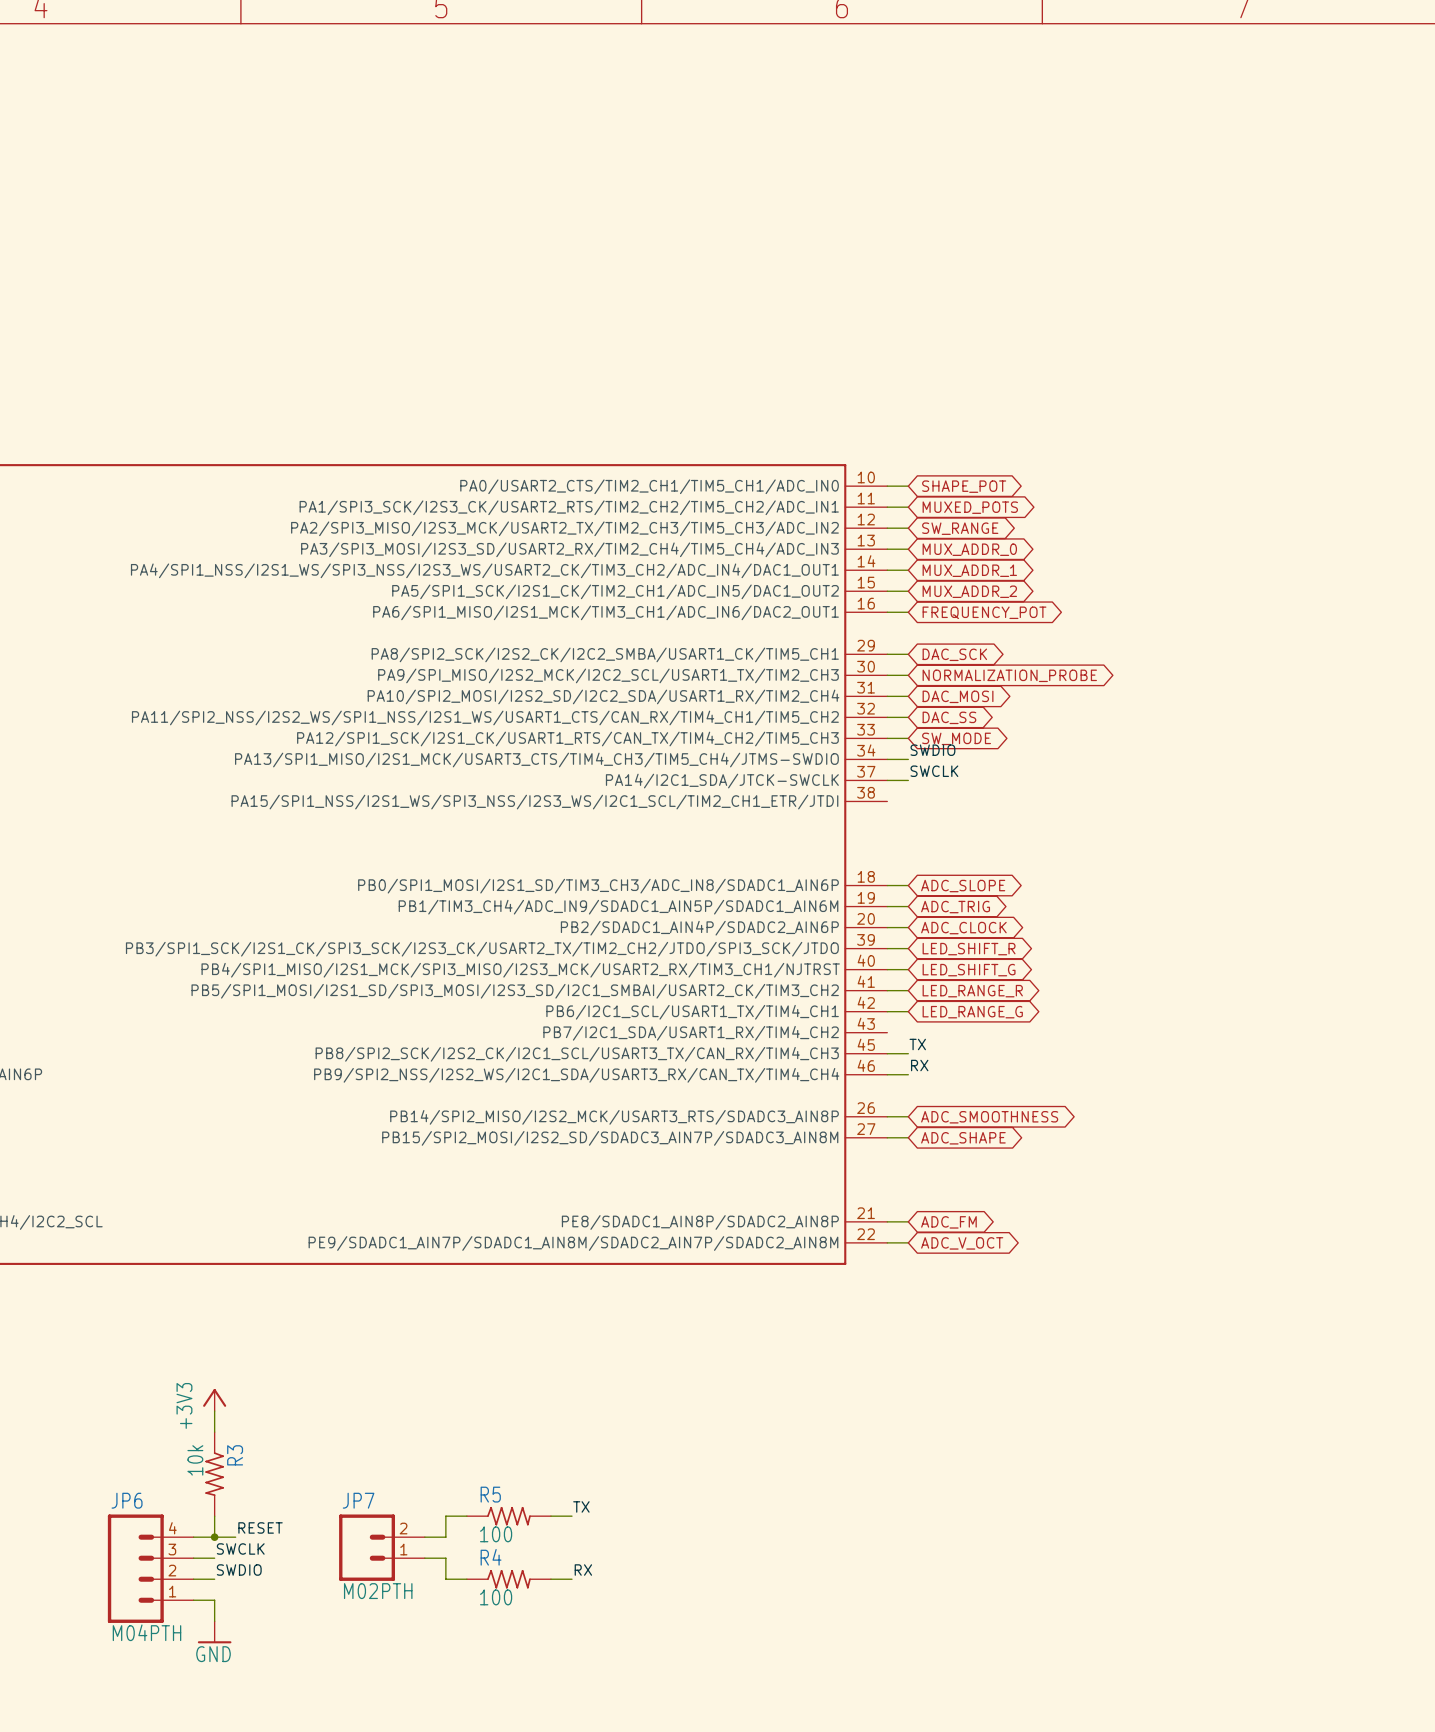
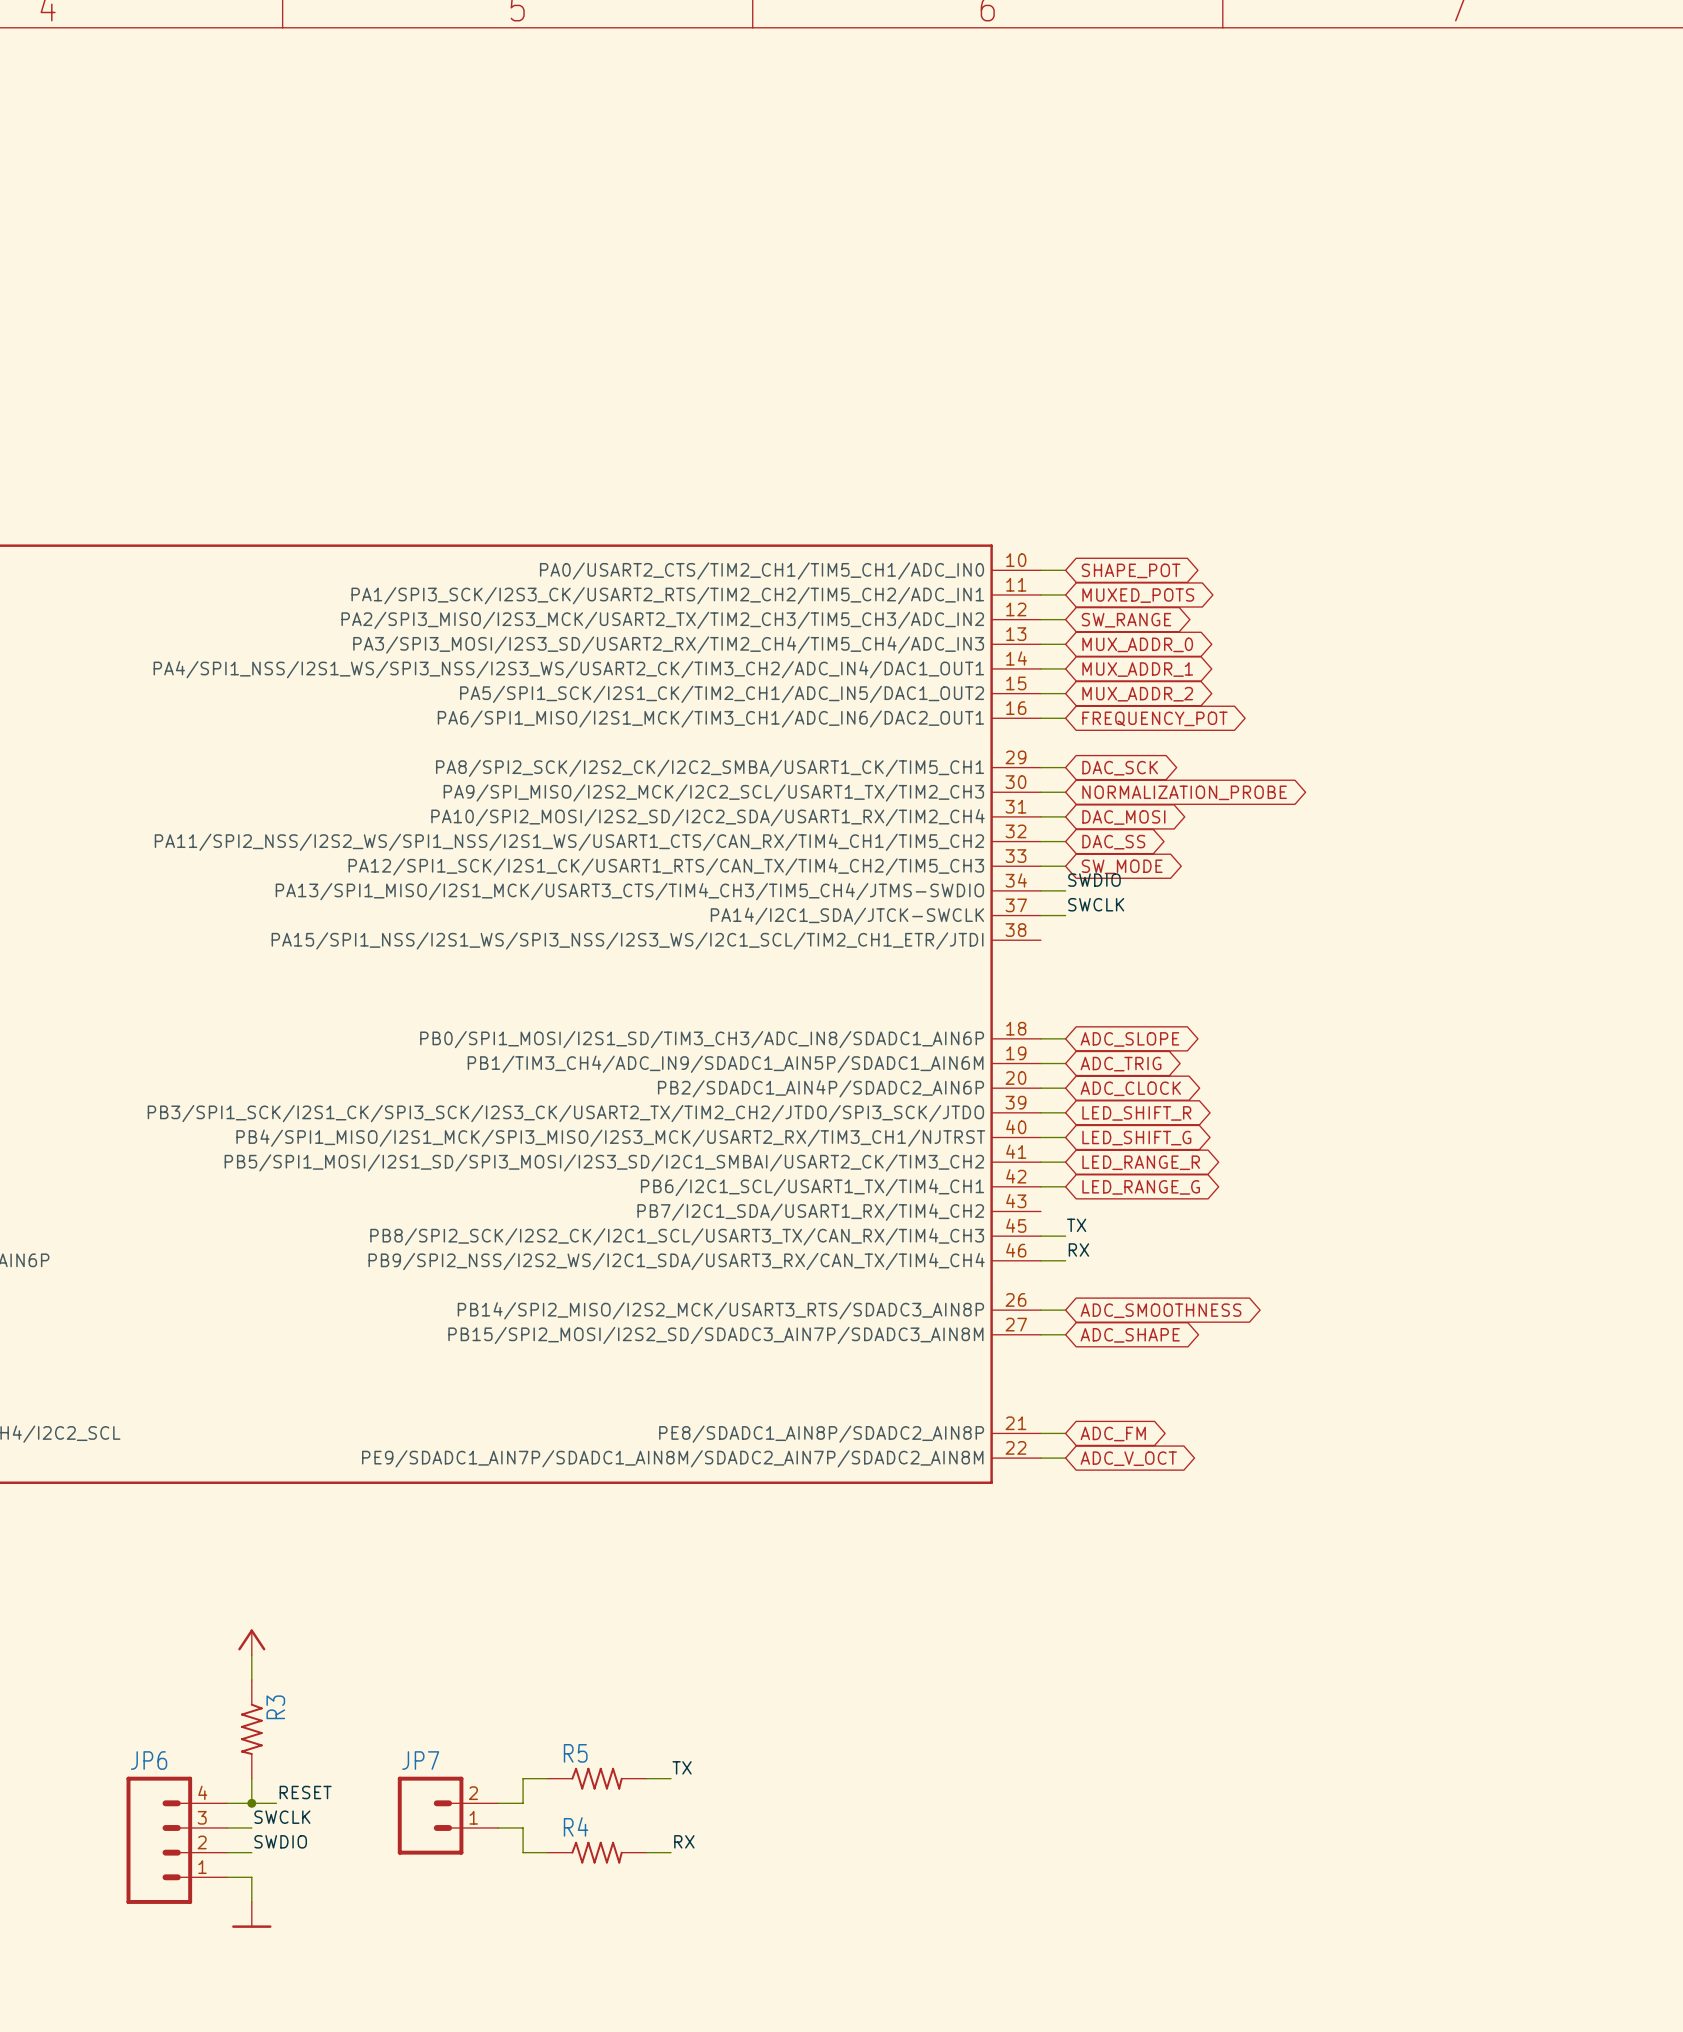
power symbol text: +3V3 (184, 1405) -> none
R3 value: 10k (195, 1460) -> none
R5 value: 100 (496, 1534) -> none
JP7 value: M02PTH (378, 1591) -> none
R4 value: 100 (496, 1597) -> none
JP6 value: M04PTH (147, 1632) -> none
power symbol text: GND (213, 1654) -> none

